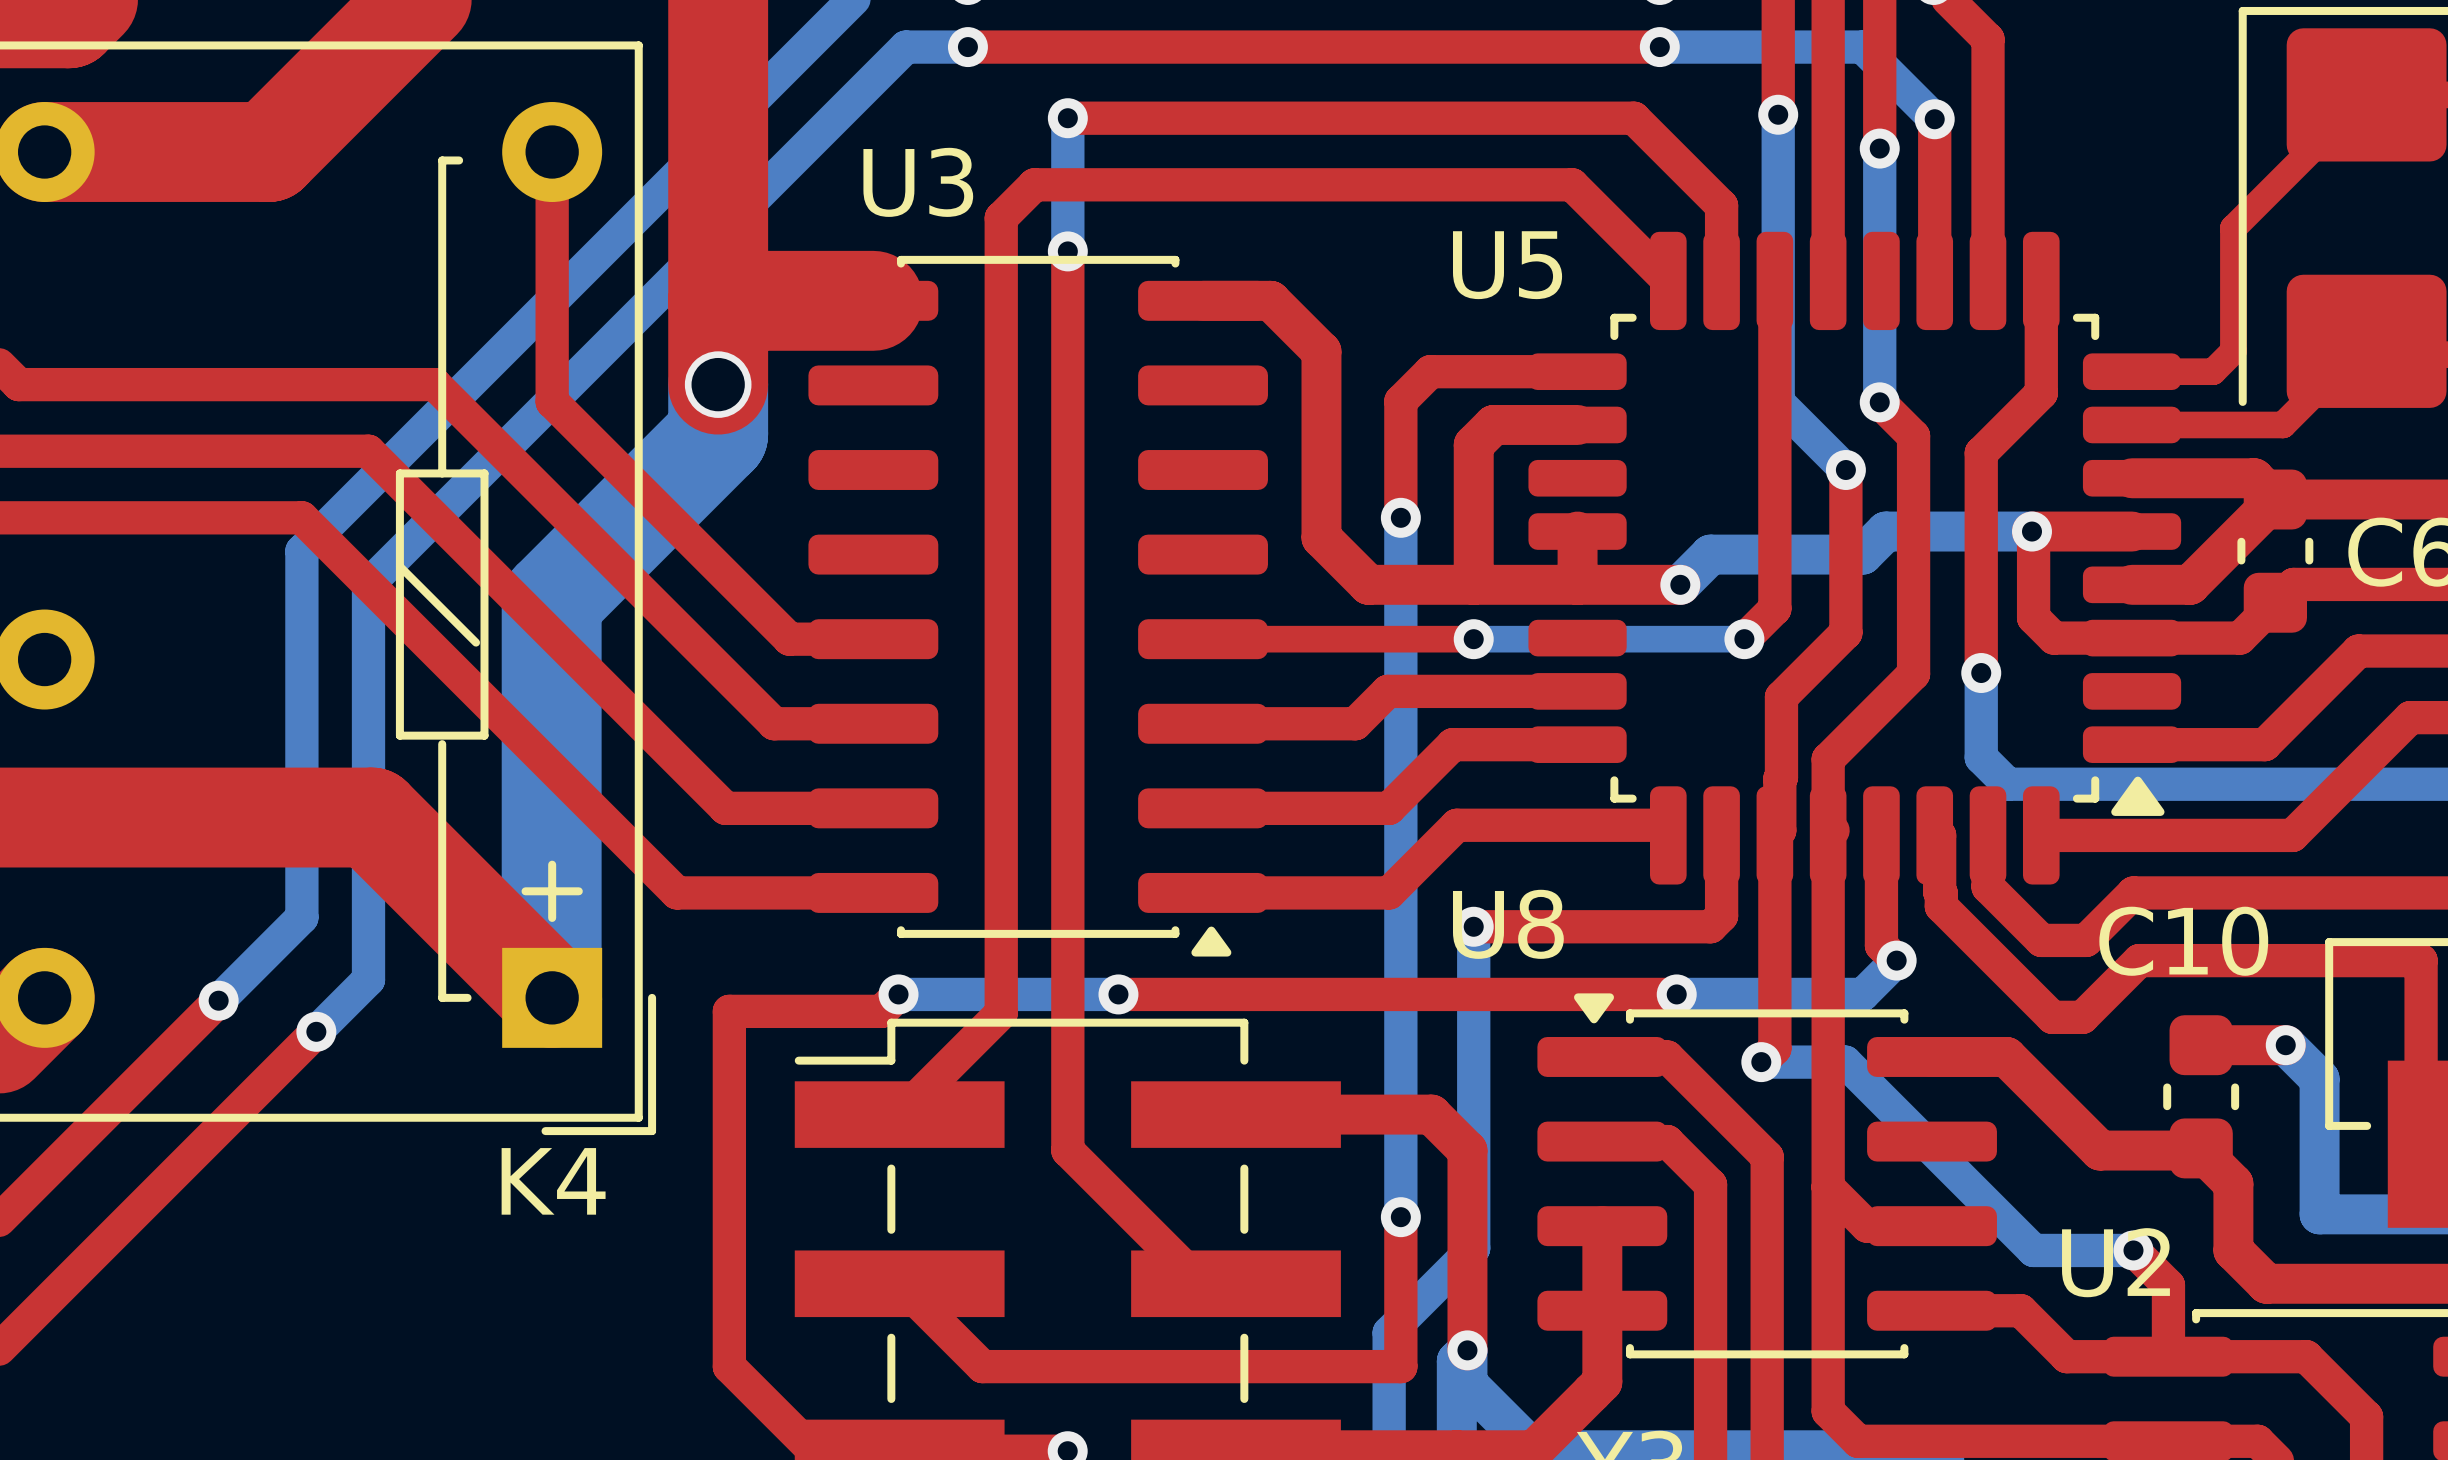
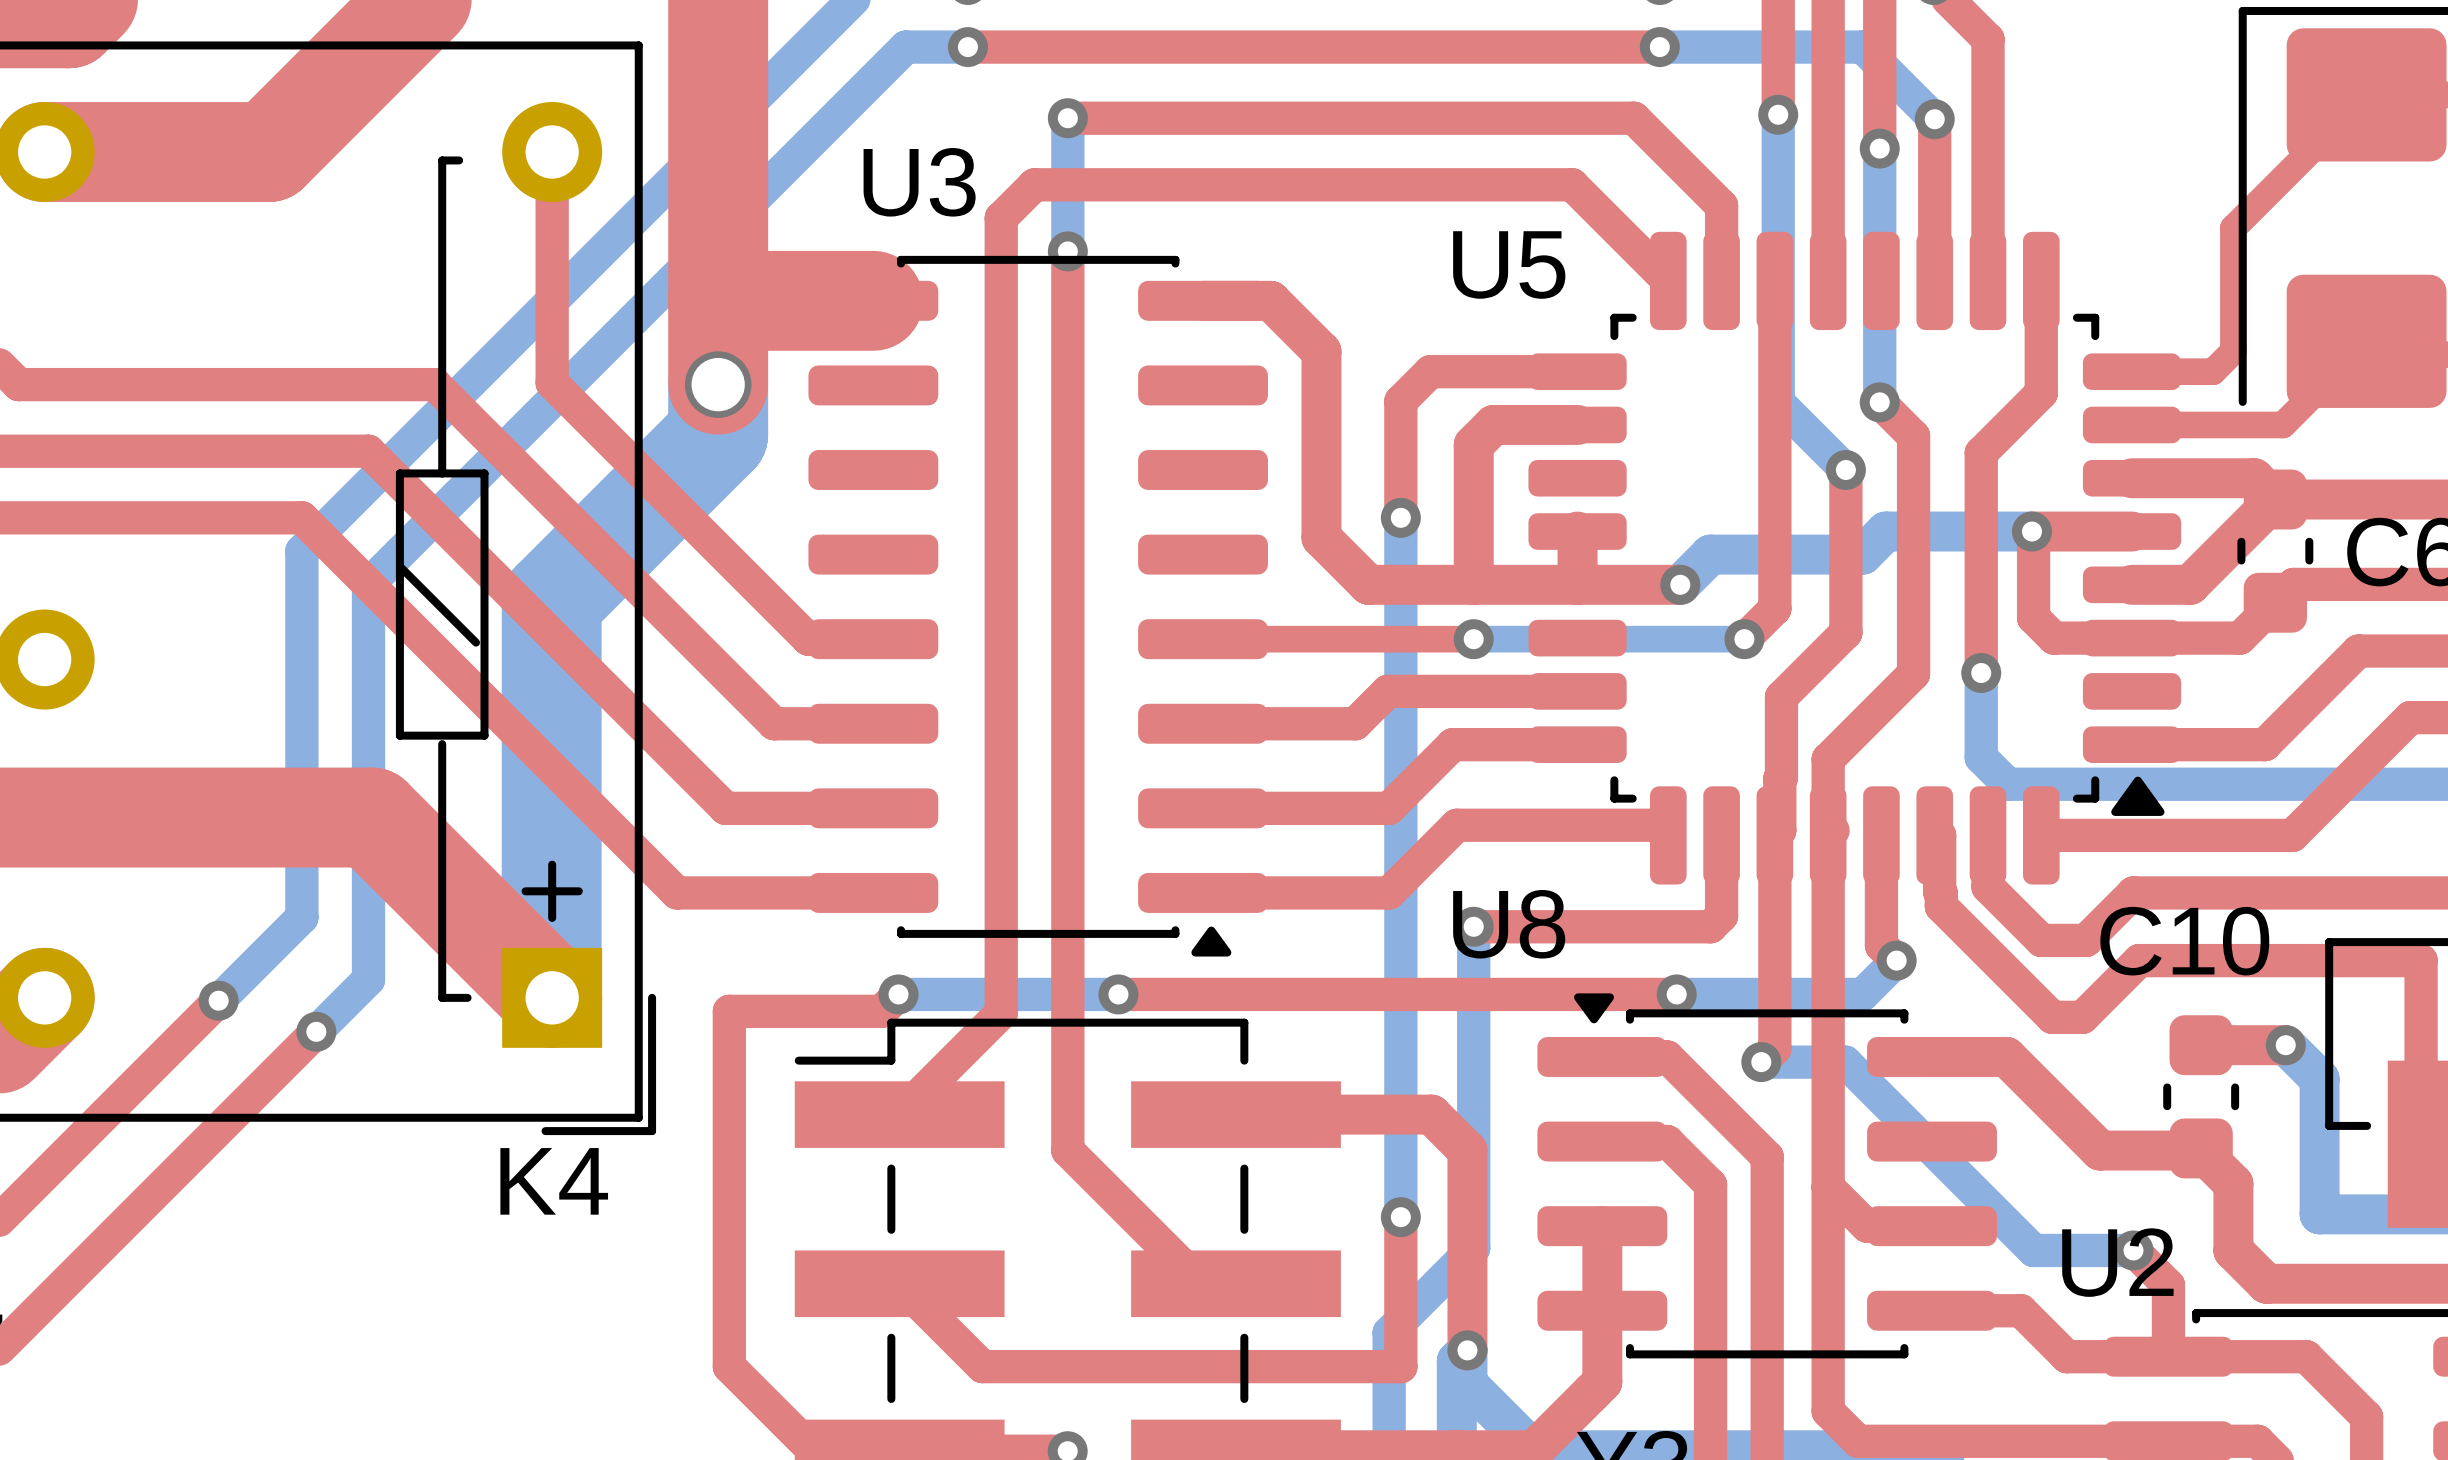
top track: (552, 382) (552, 401) (789, 639) (808, 639) -> (552, 382) (808, 639)

